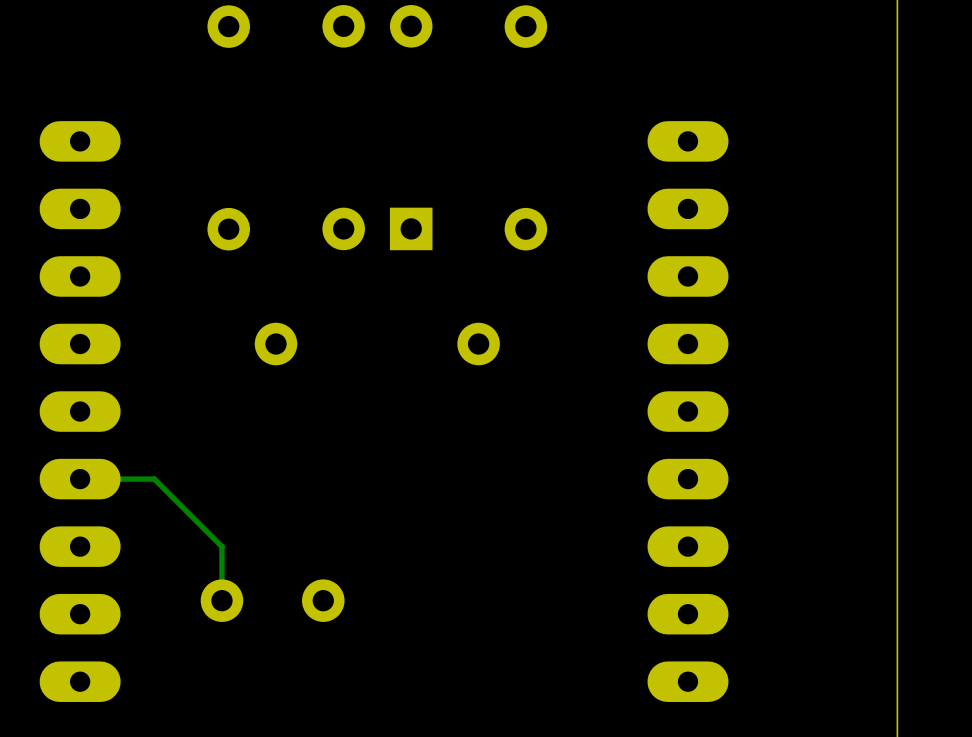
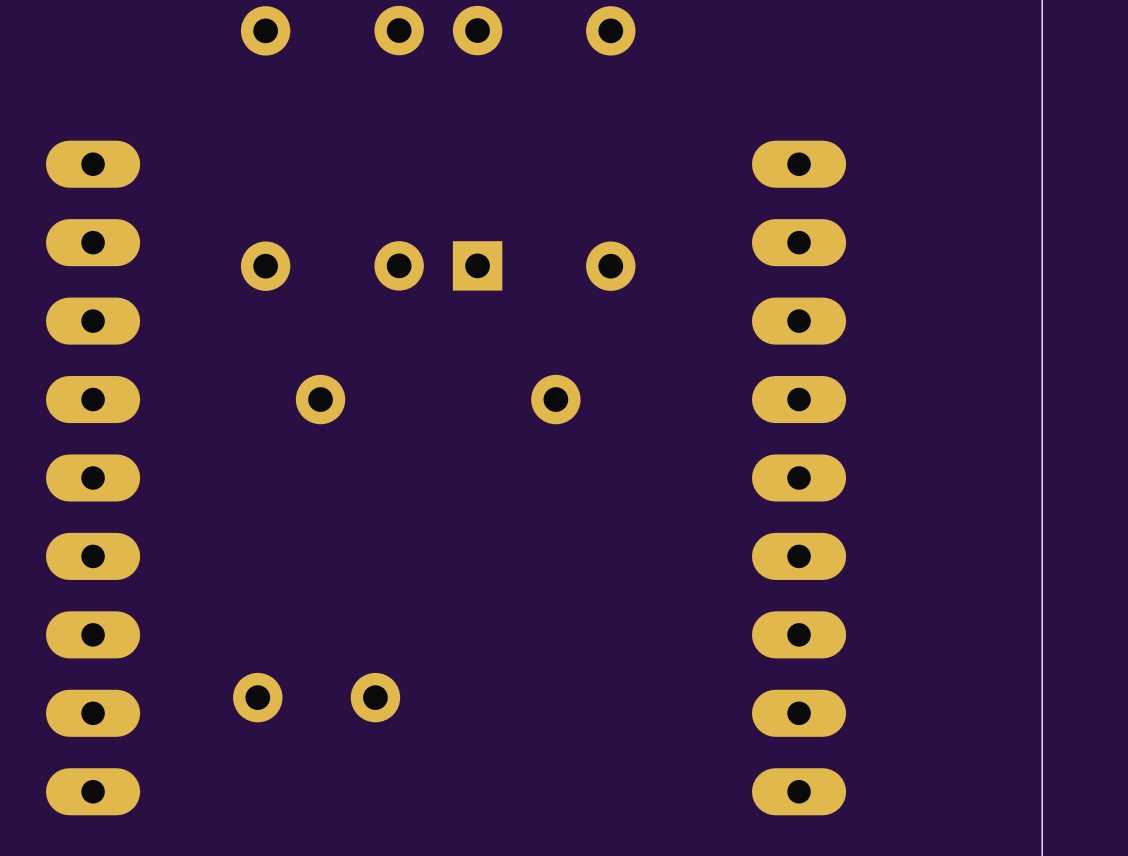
track: (80, 479) (154, 479) (221, 546) (221, 600) -> none

